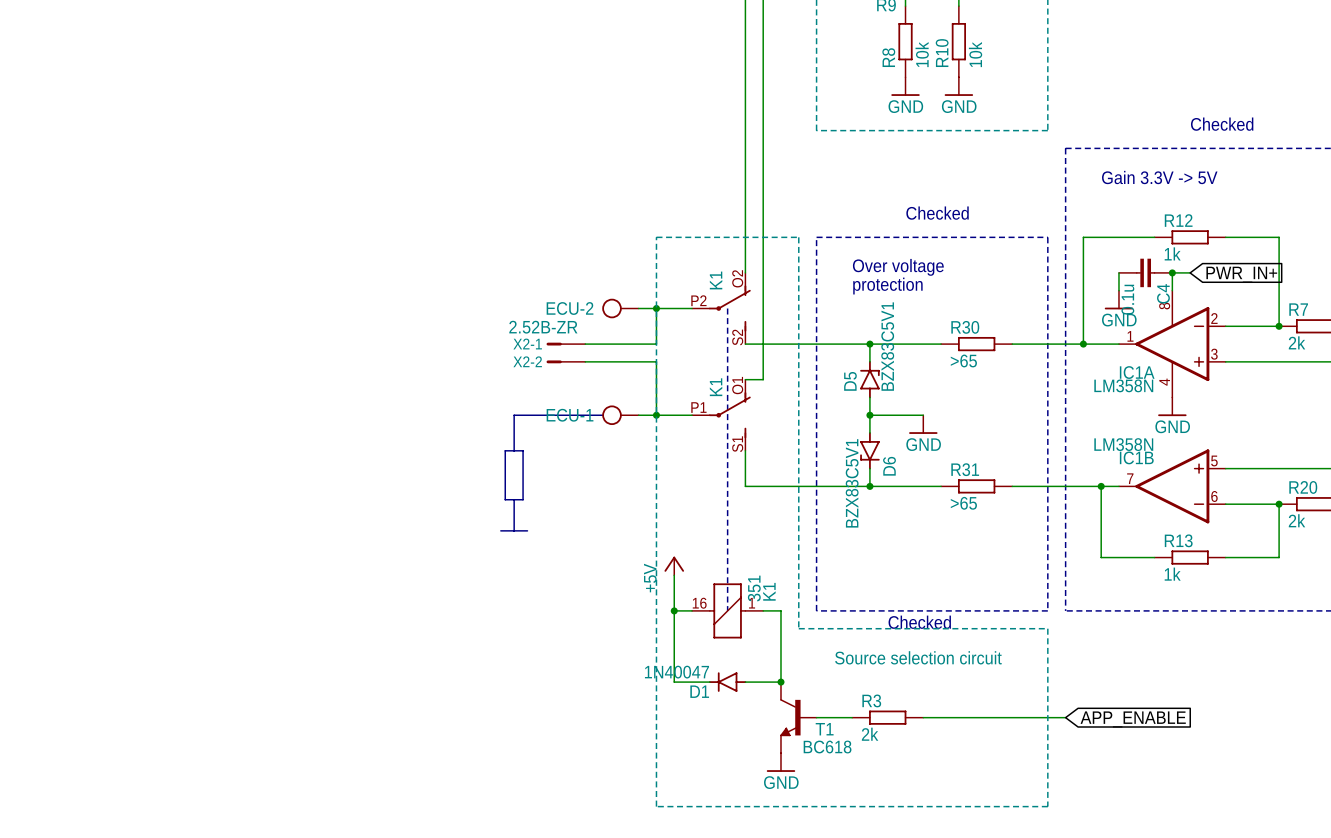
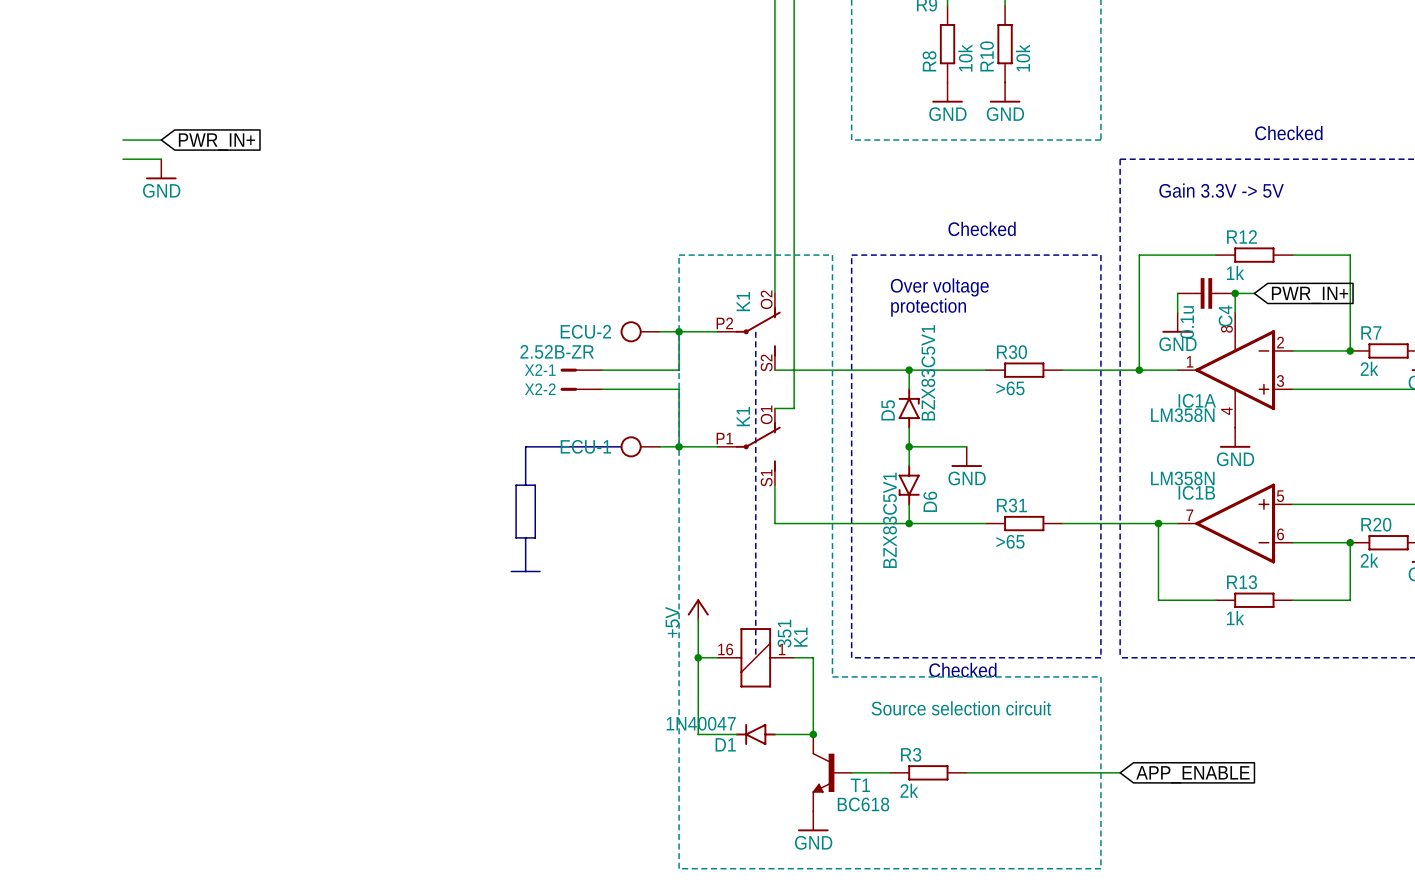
wire: none -> (122, 140) (161, 140)
global label: none -> PWR_IN+ (216, 141)
wire: none -> (122, 159) (161, 159)
power symbol: none -> GND (161, 169)

